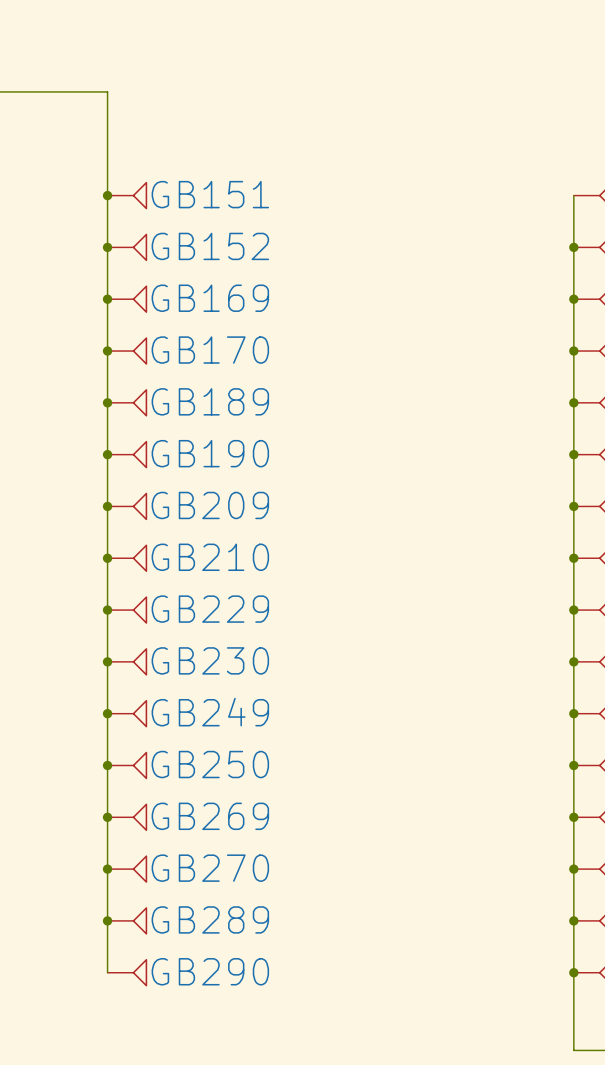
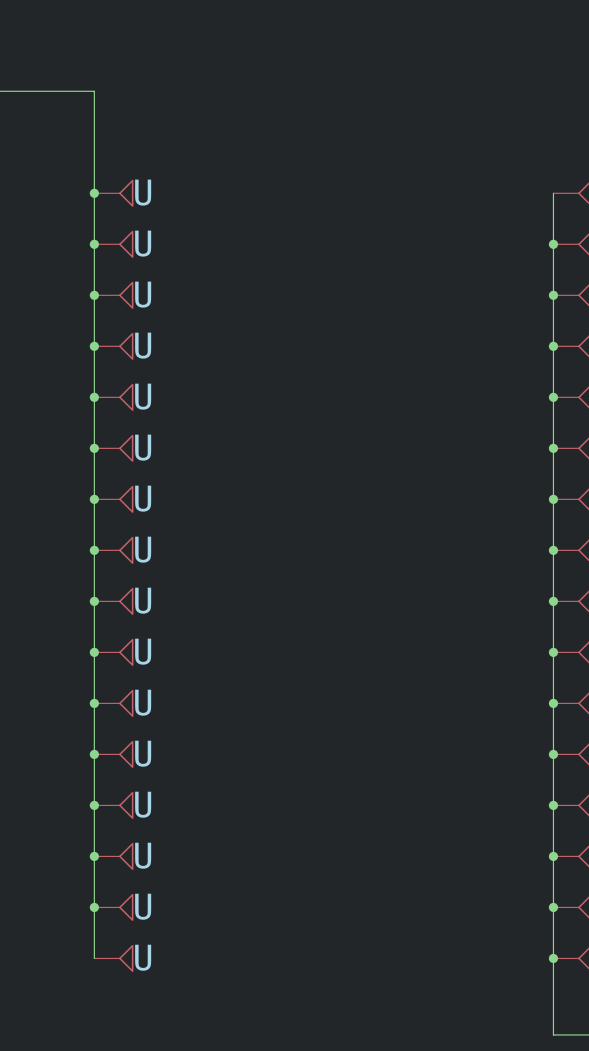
GB151 name: GB151 (210, 194) -> U (143, 192)
GB152 name: GB152 (210, 246) -> U (143, 243)
GB169 name: GB169 (210, 298) -> U (143, 294)
GB170 name: GB170 (210, 350) -> U (143, 345)
GB189 name: GB189 (210, 401) -> U (143, 396)
GB190 name: GB190 (210, 453) -> U (143, 447)
GB209 name: GB209 (210, 505) -> U (143, 498)
GB210 name: GB210 (210, 557) -> U (143, 549)
GB229 name: GB229 (210, 609) -> U (143, 600)
GB230 name: GB230 (210, 660) -> U (143, 651)
GB249 name: GB249 (210, 712) -> U (143, 702)
GB250 name: GB250 (210, 764) -> U (143, 753)
GB269 name: GB269 (210, 816) -> U (143, 804)
GB270 name: GB270 (210, 868) -> U (143, 855)
GB289 name: GB289 (210, 919) -> U (143, 906)
GB290 name: GB290 (210, 971) -> U (143, 957)

